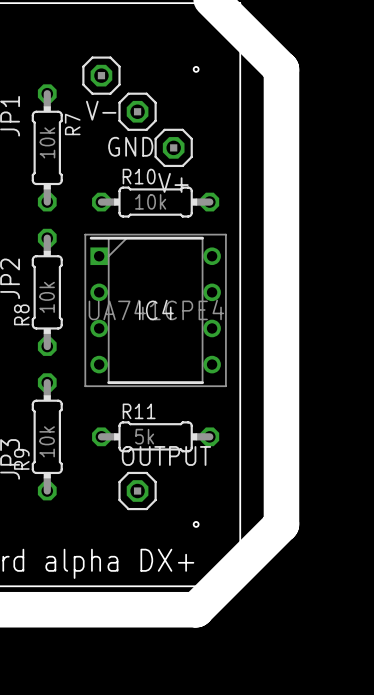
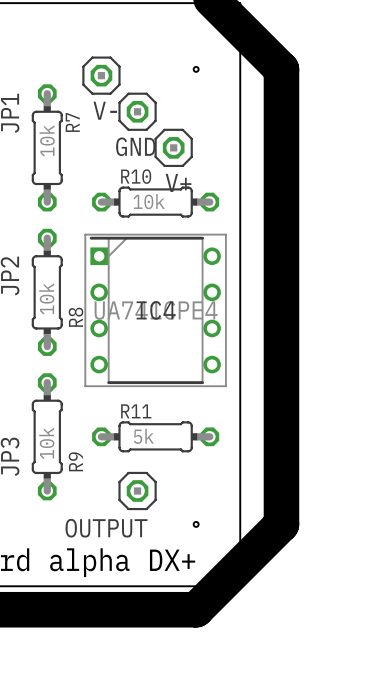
R8 name position: R8 (21, 314) -> R8 (75, 317)
OUTPUT name position: OUTPUT (166, 455) -> OUTPUT (106, 528)
R9 name position: R9 (21, 459) -> R9 (75, 461)

